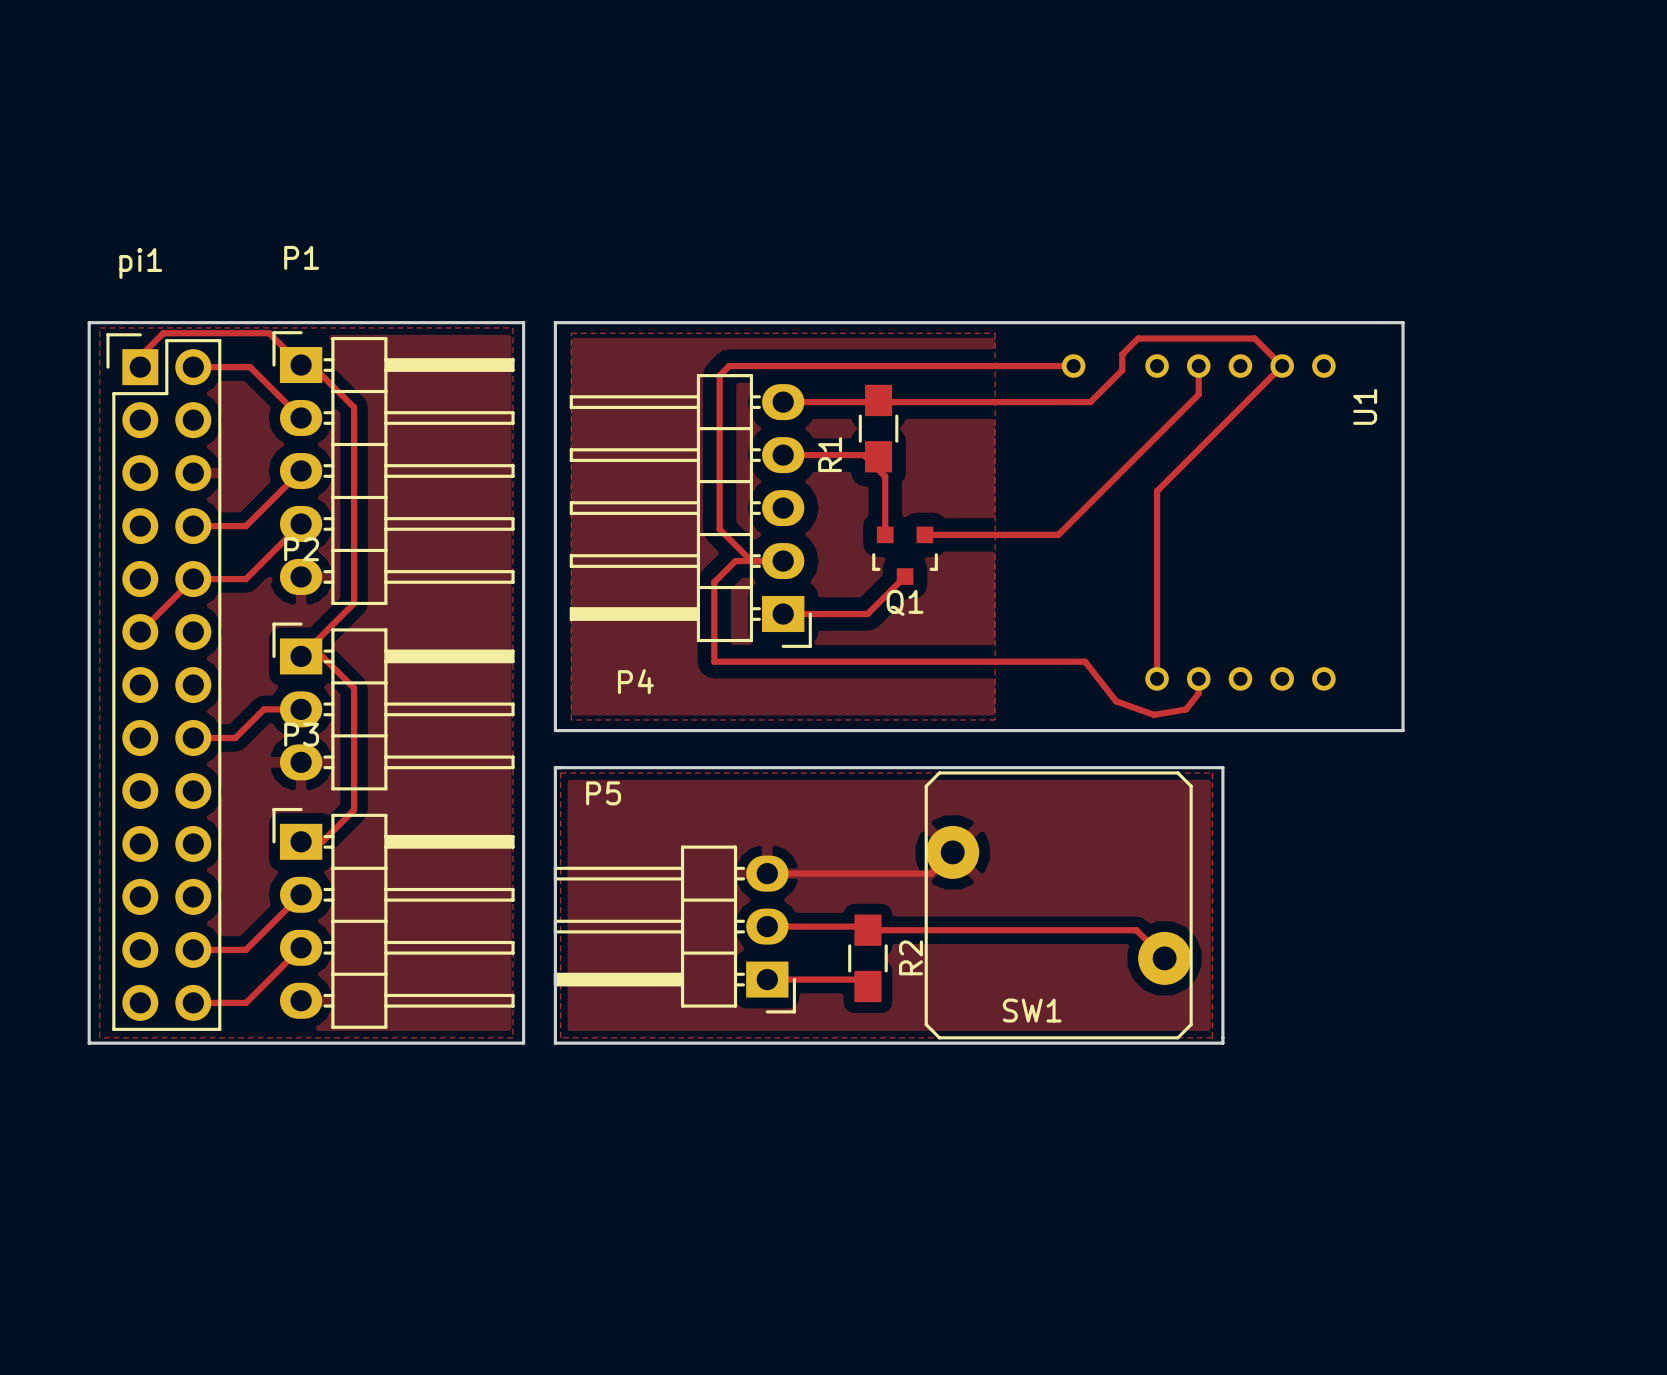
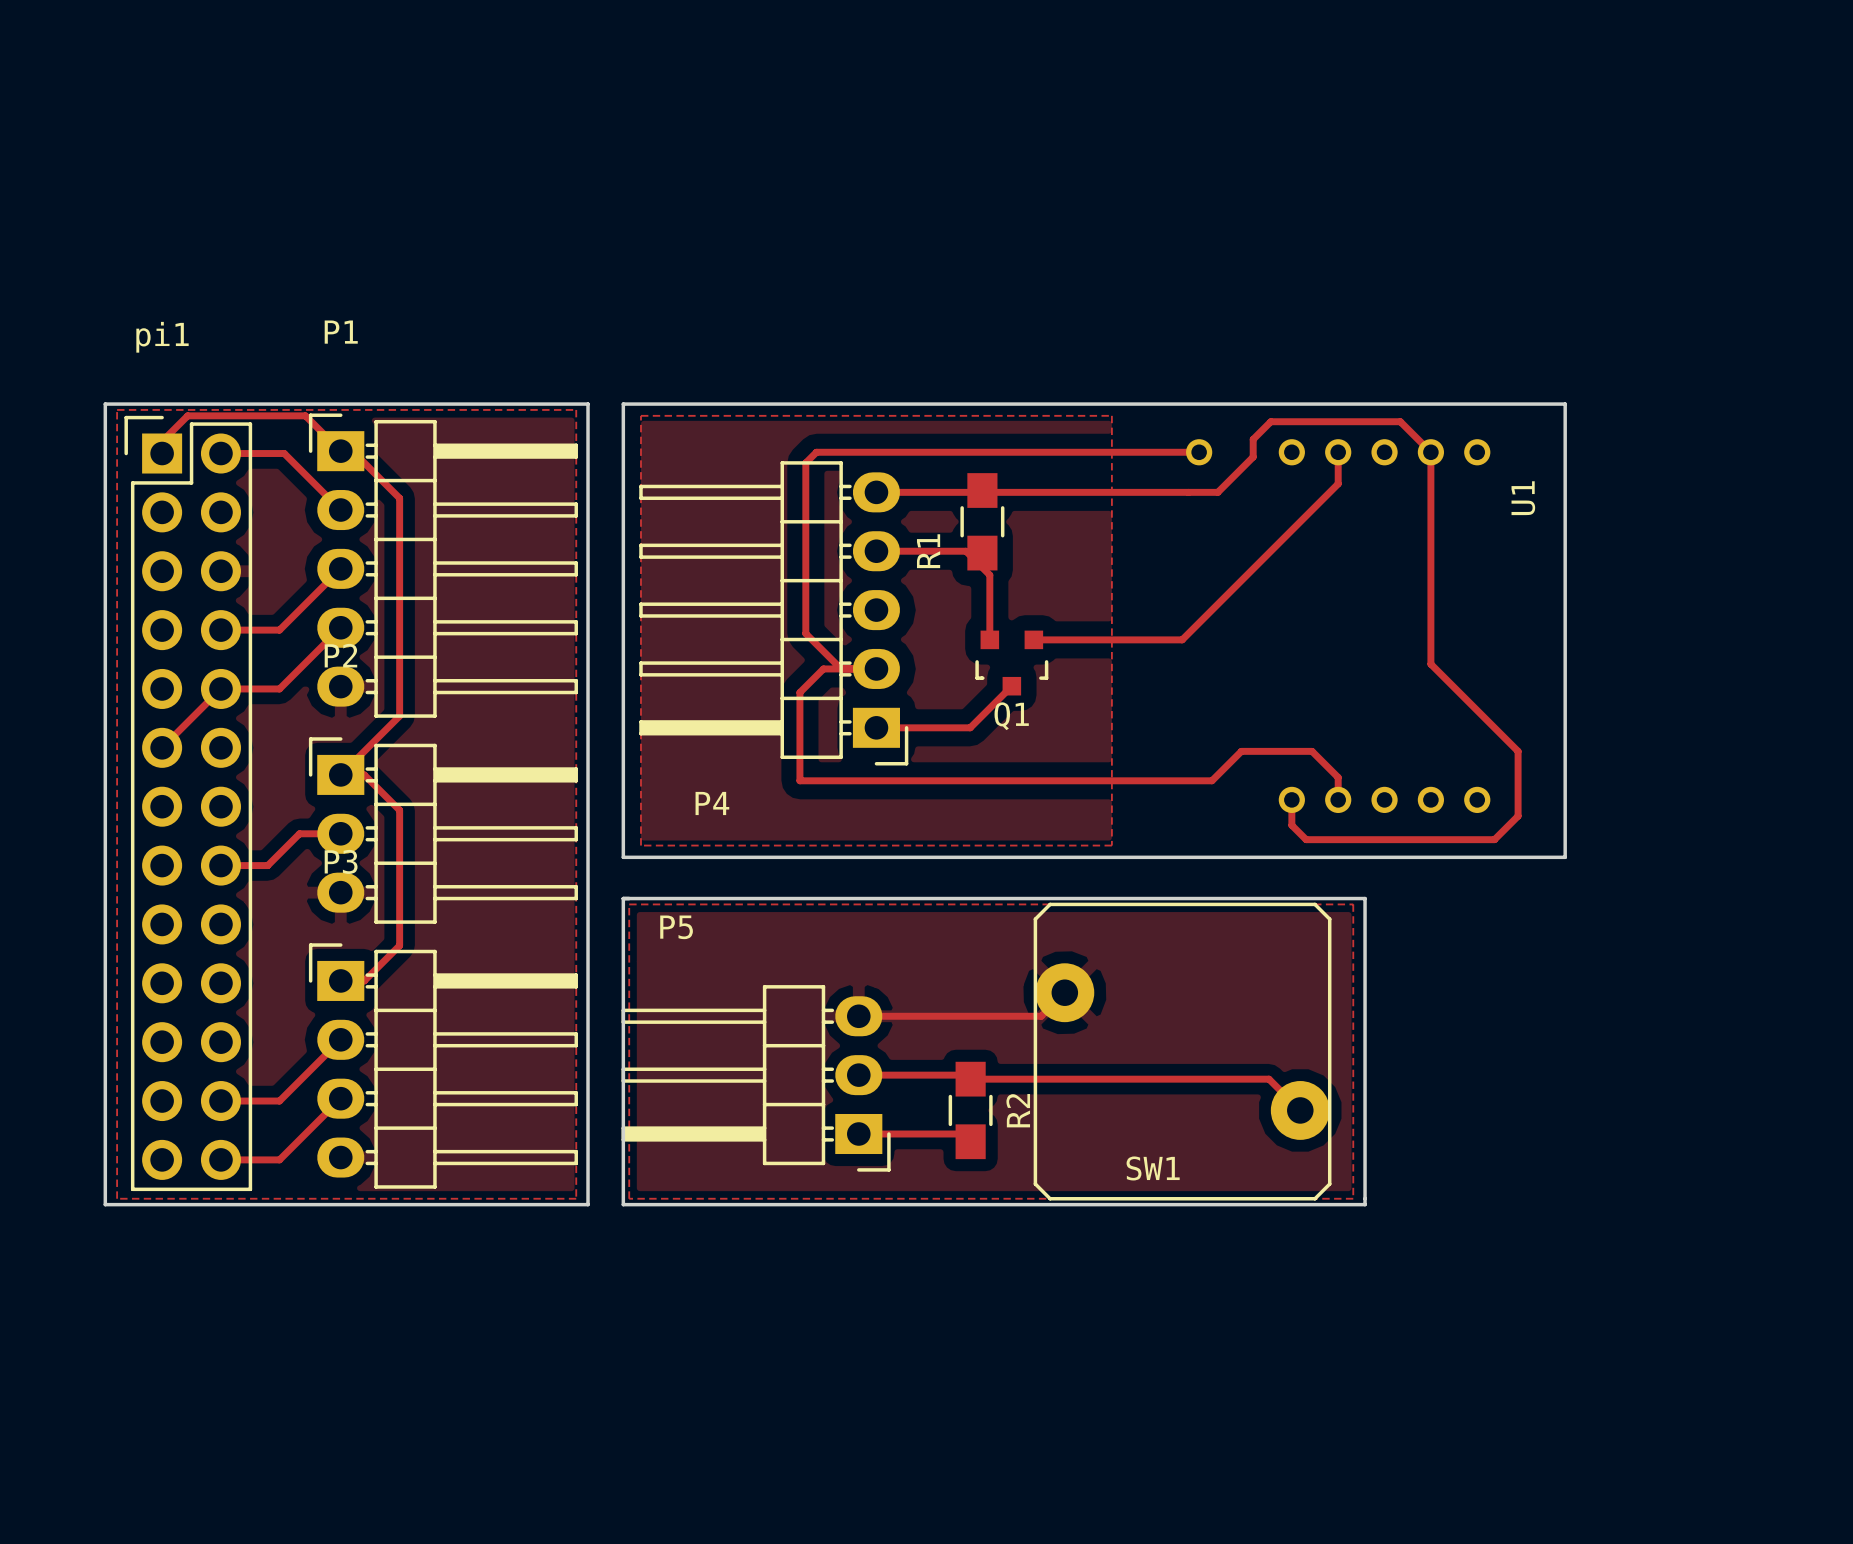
track: (1282, 366) (1157, 491) (1157, 678) -> (1430, 452) (1430, 664) (1518, 751) (1518, 816) (1494, 839) (1306, 839) (1291, 825) (1291, 799)
track: (1085, 661) (1116, 701) (1154, 714) (1186, 709) (1198, 693) (1198, 678) -> (1211, 780) (1241, 751) (1312, 751) (1338, 777) (1338, 799)

